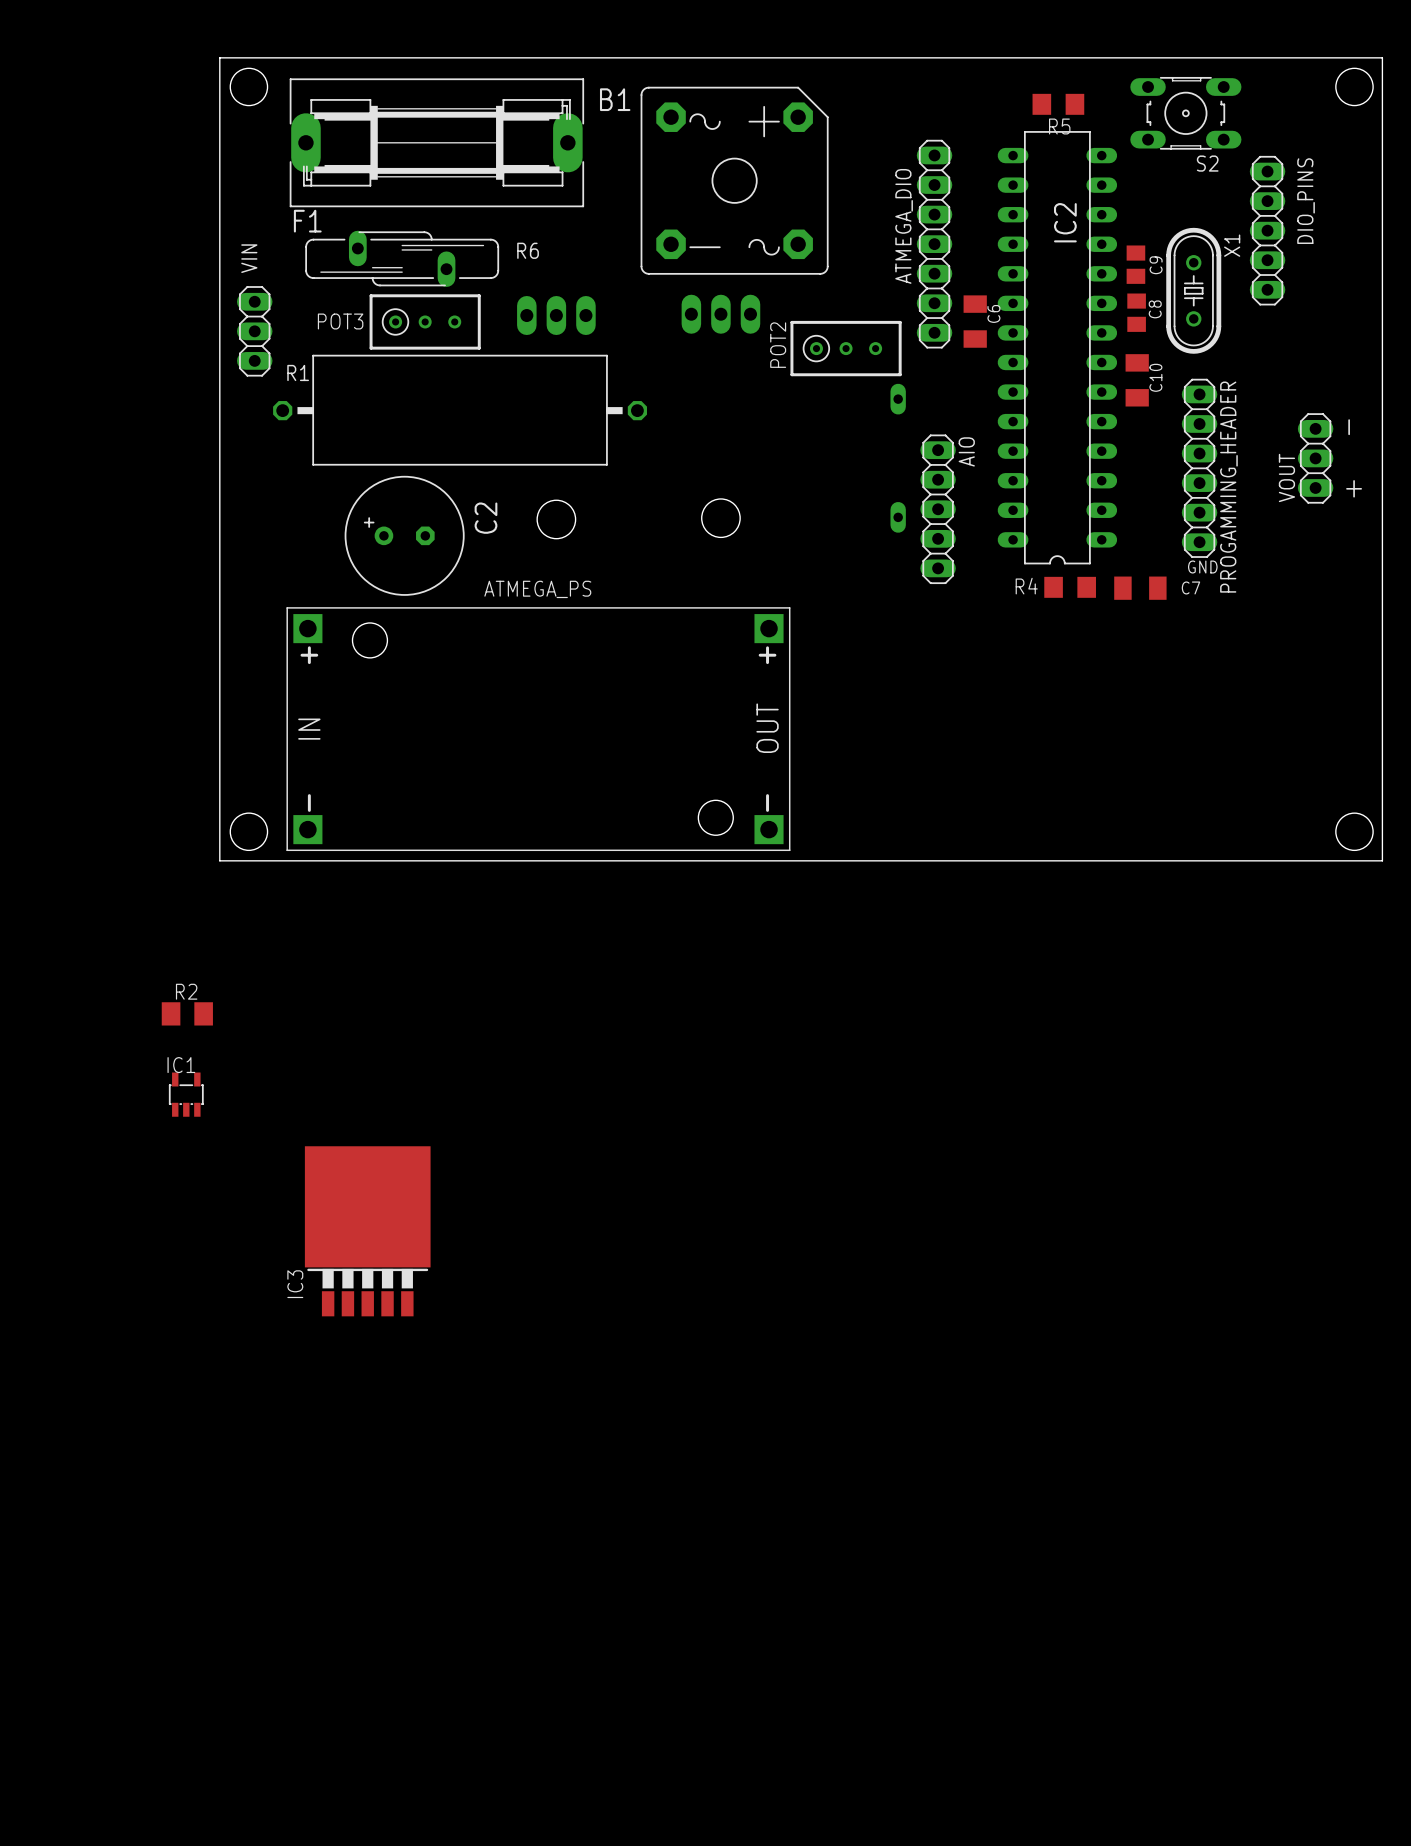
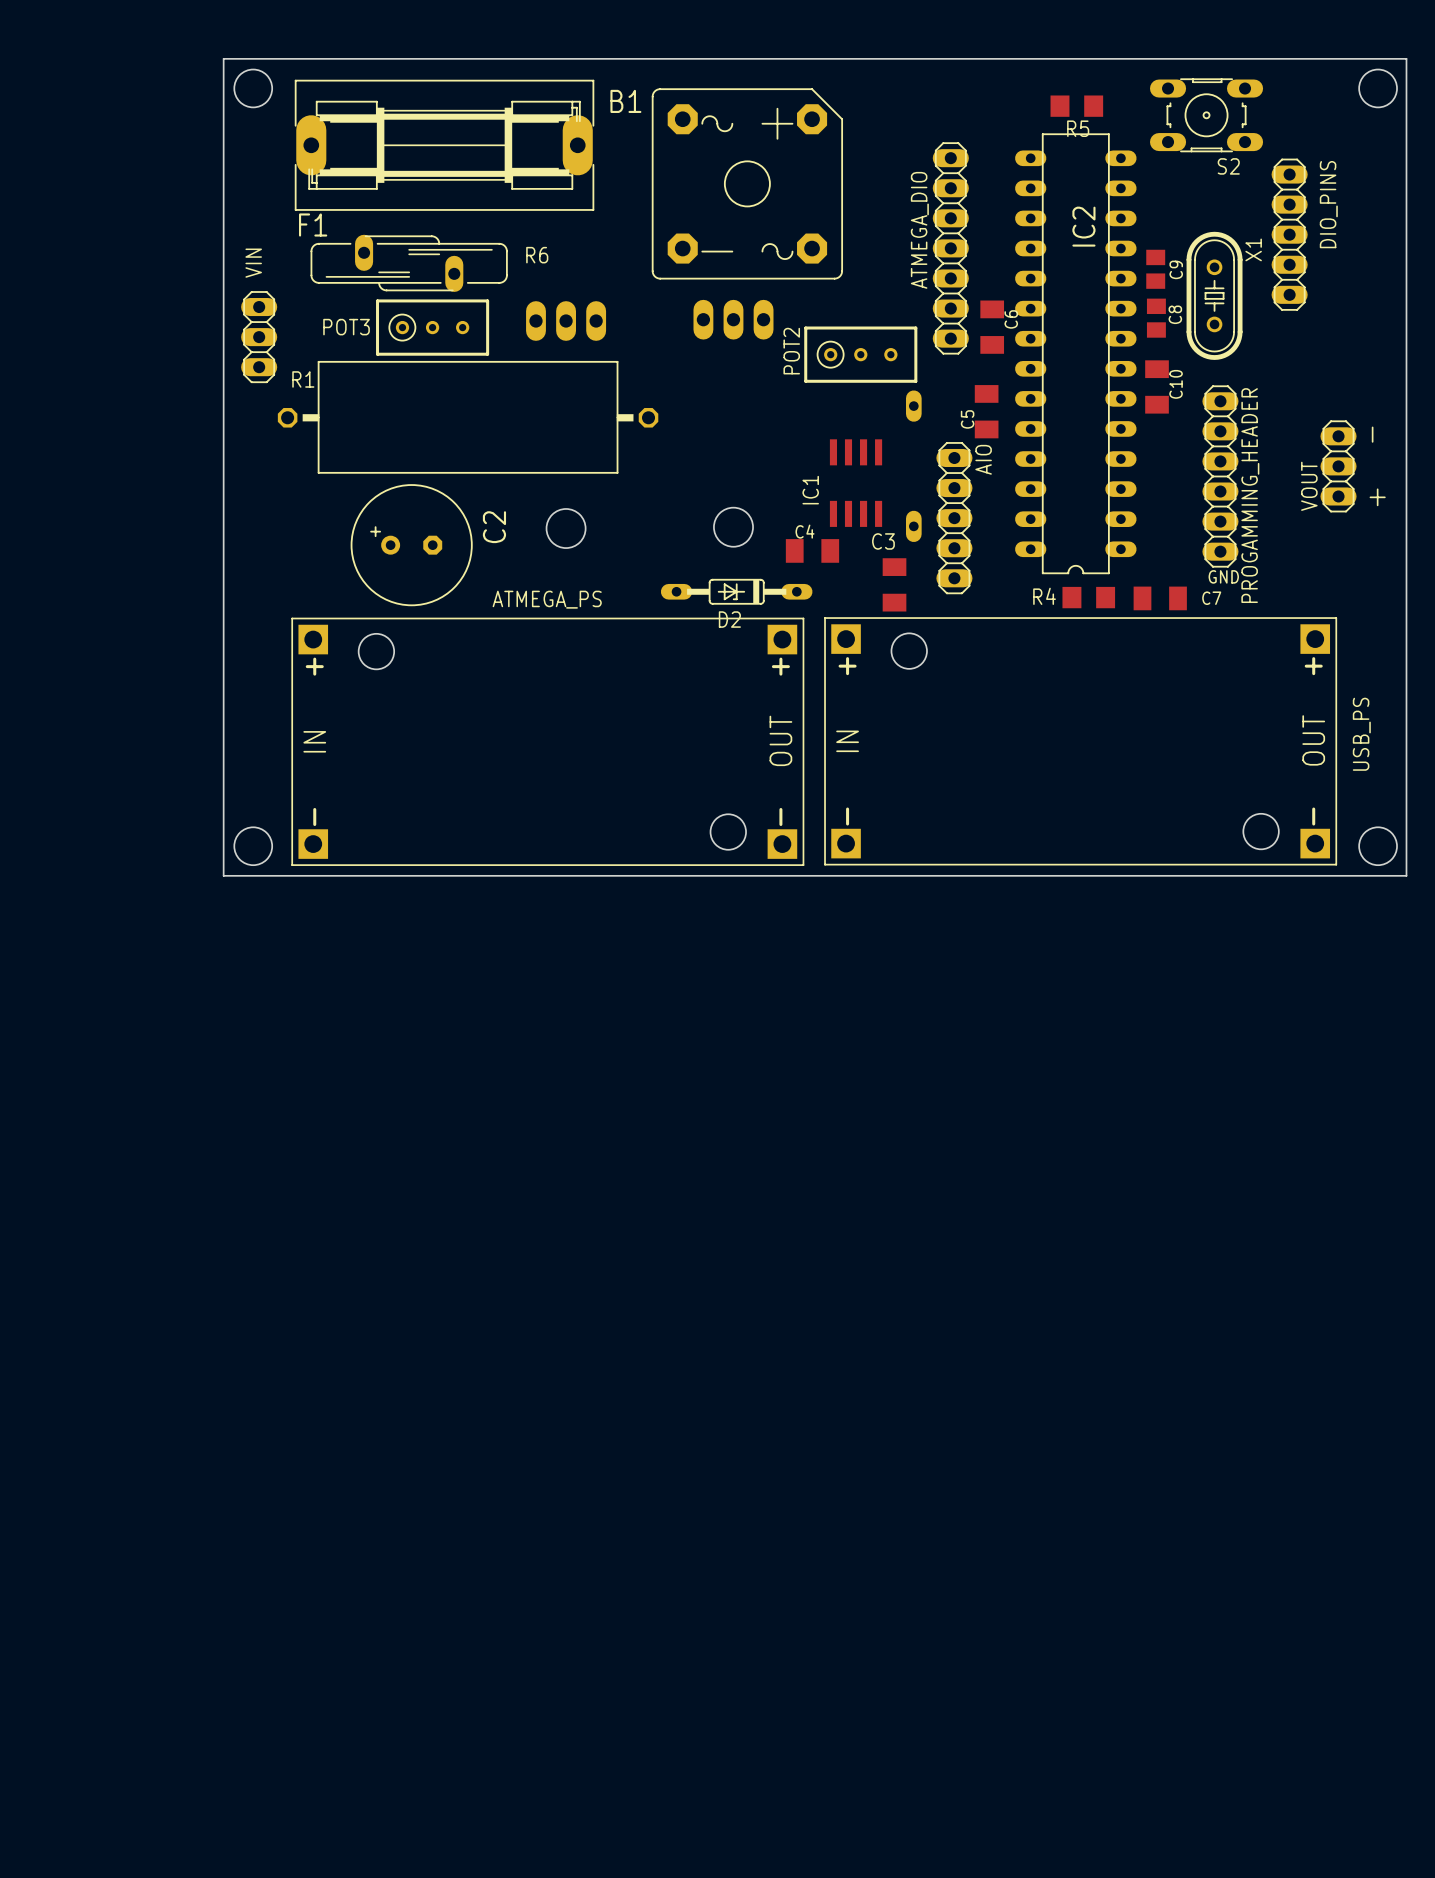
C5: none -> (986, 411)
C4: none -> (812, 550)
C3: none -> (894, 584)
D2: none -> (736, 591)
USB_PS: none -> (1080, 741)
R2: (187, 1013) -> none
IC1 name position: IC1 (181, 1065) -> IC1 (810, 490)
IC1 footprint: [168, 1072, 204, 1117] -> [829, 439, 883, 527]
IC3: (367, 1231) -> none

